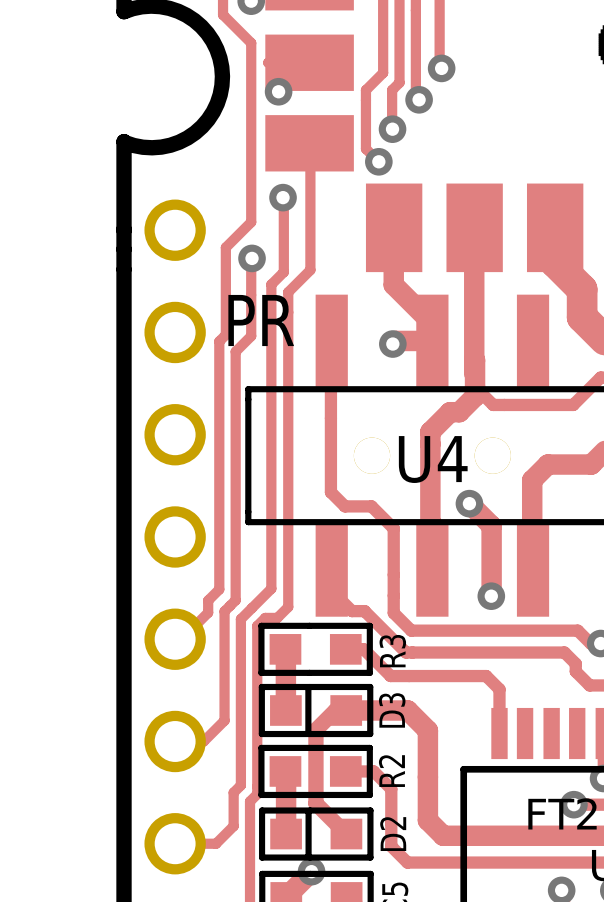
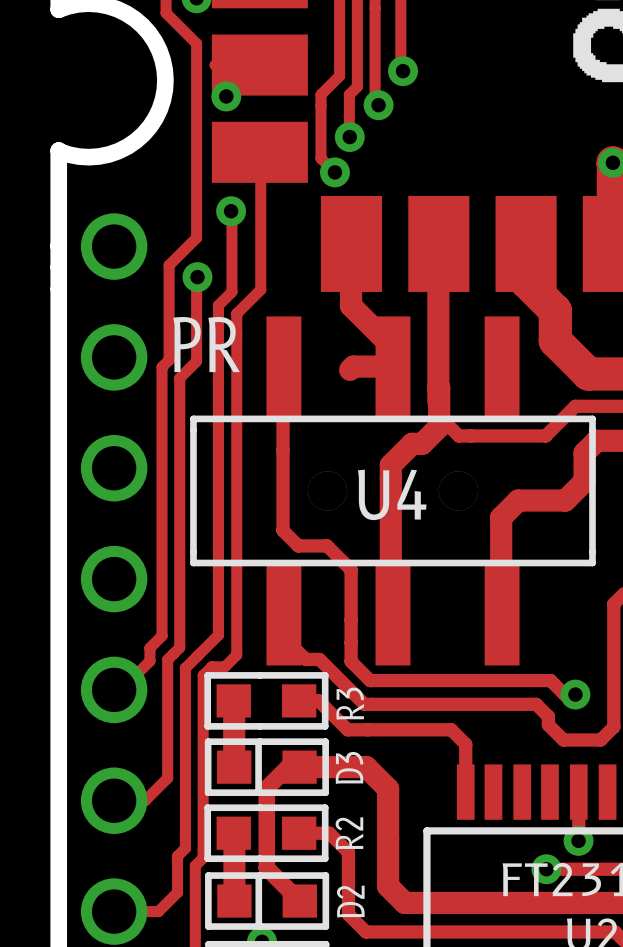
via: (392, 344) -> none
track: (469, 503) (491, 525) (491, 595) -> none
via: (469, 503) -> none
via: (491, 596) -> none

